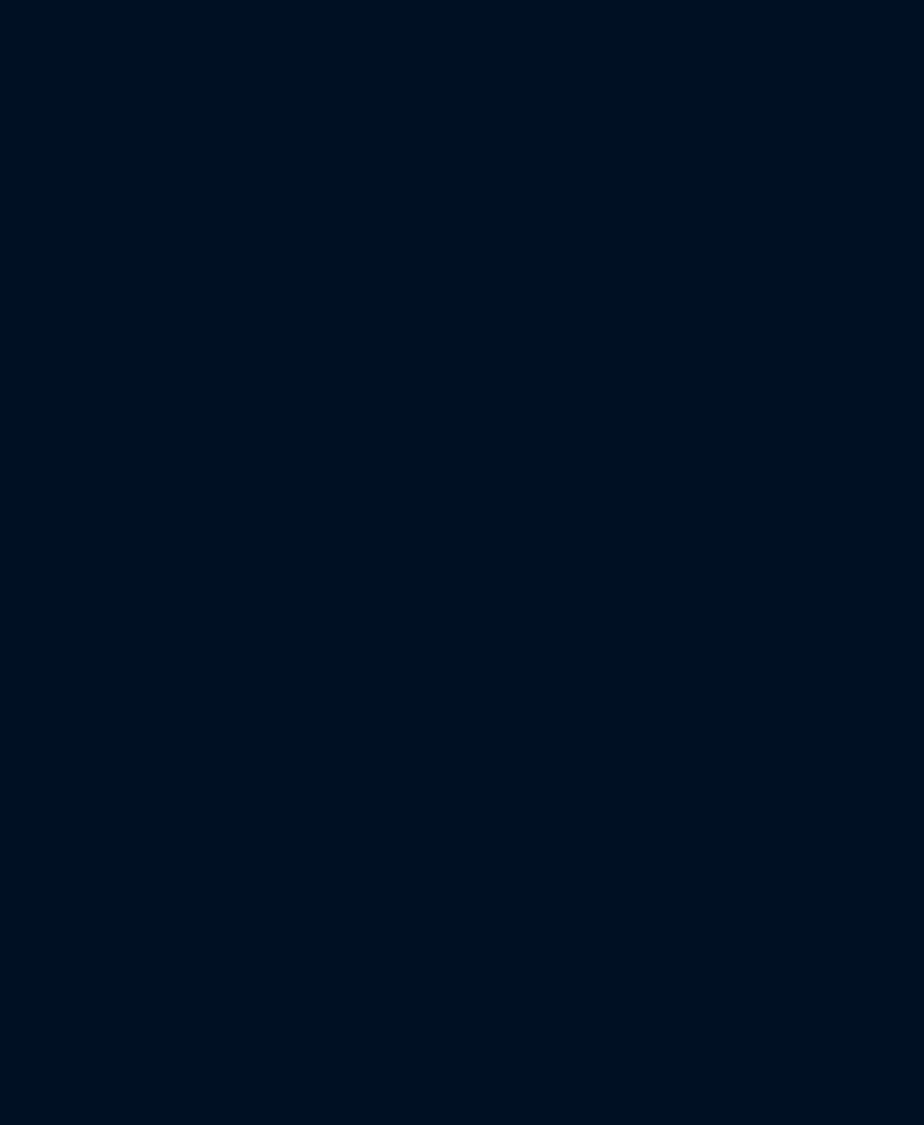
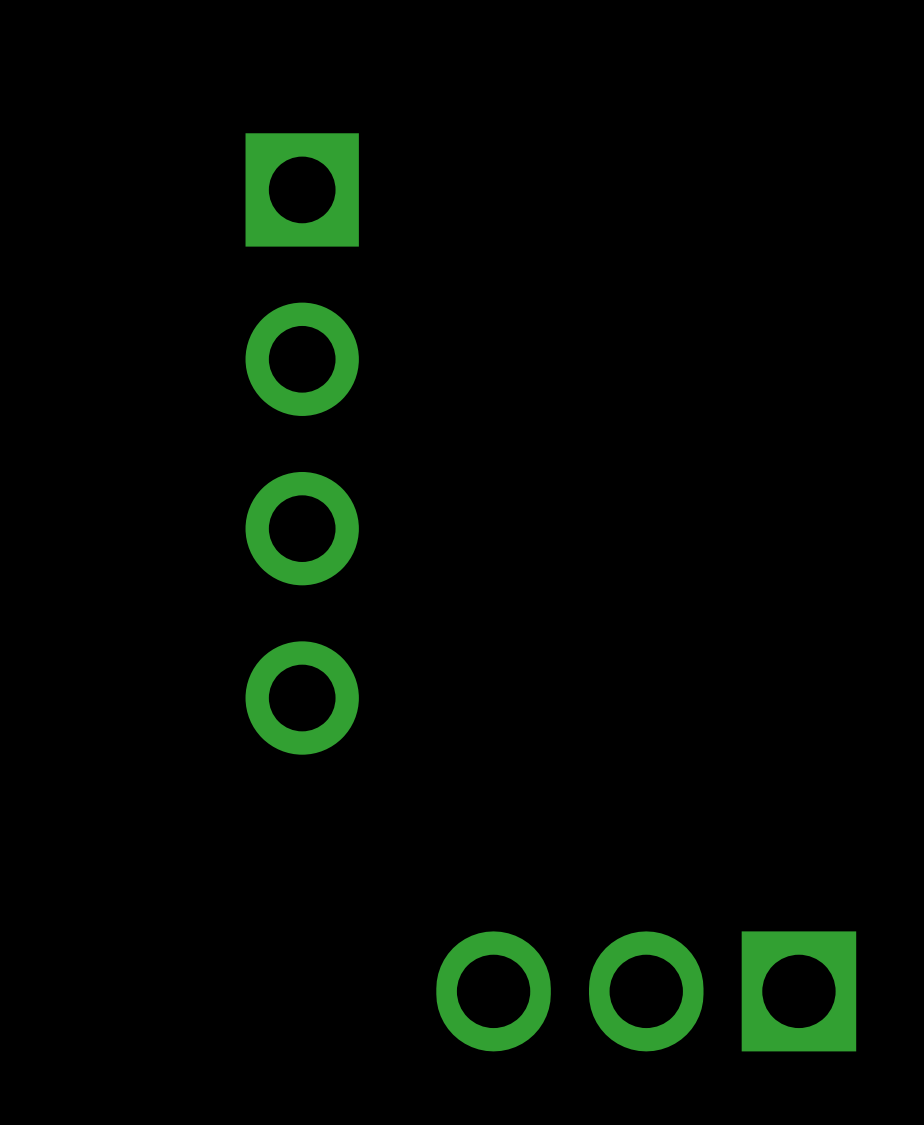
part: none -> (302, 443)
part: none -> (646, 991)

